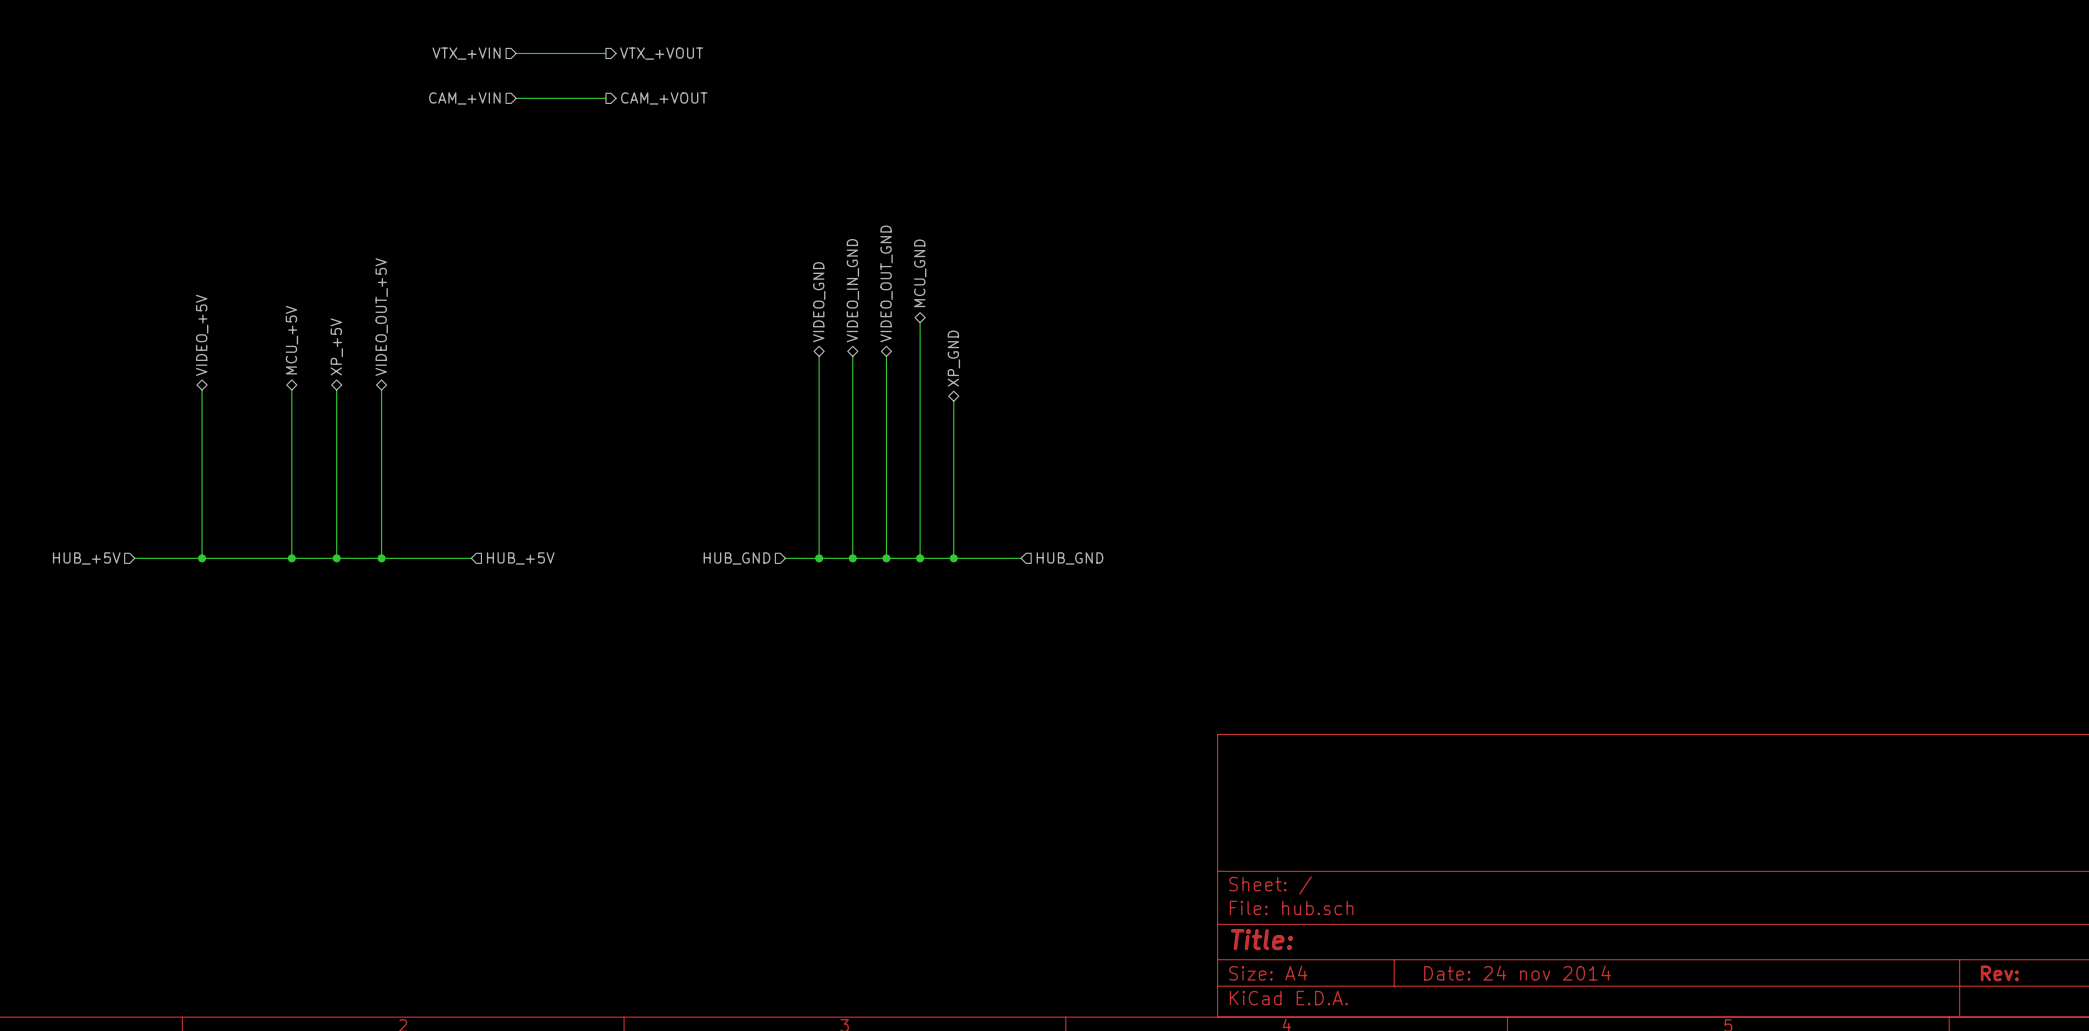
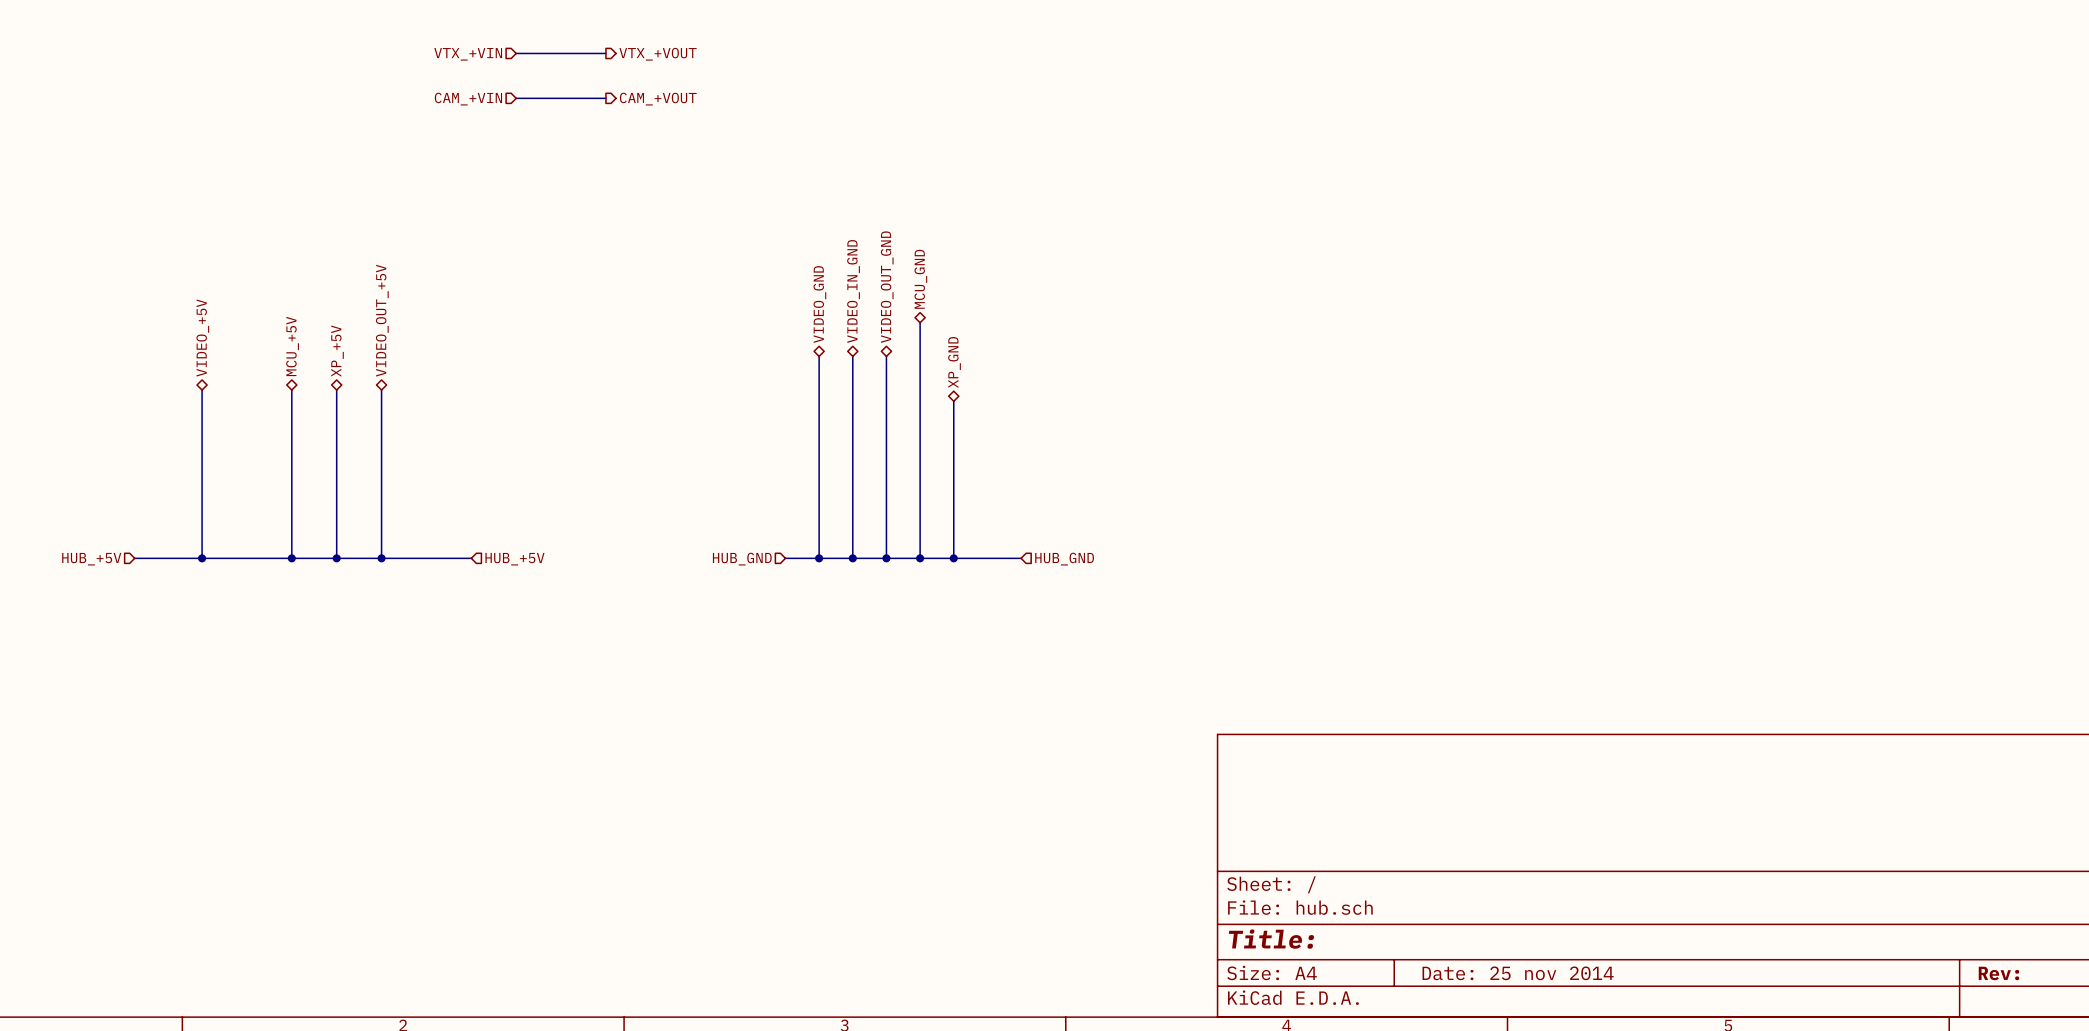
title block: Date: 24 nov 2014 (1517, 973) -> Date: 25 nov 2014 (1518, 973)

